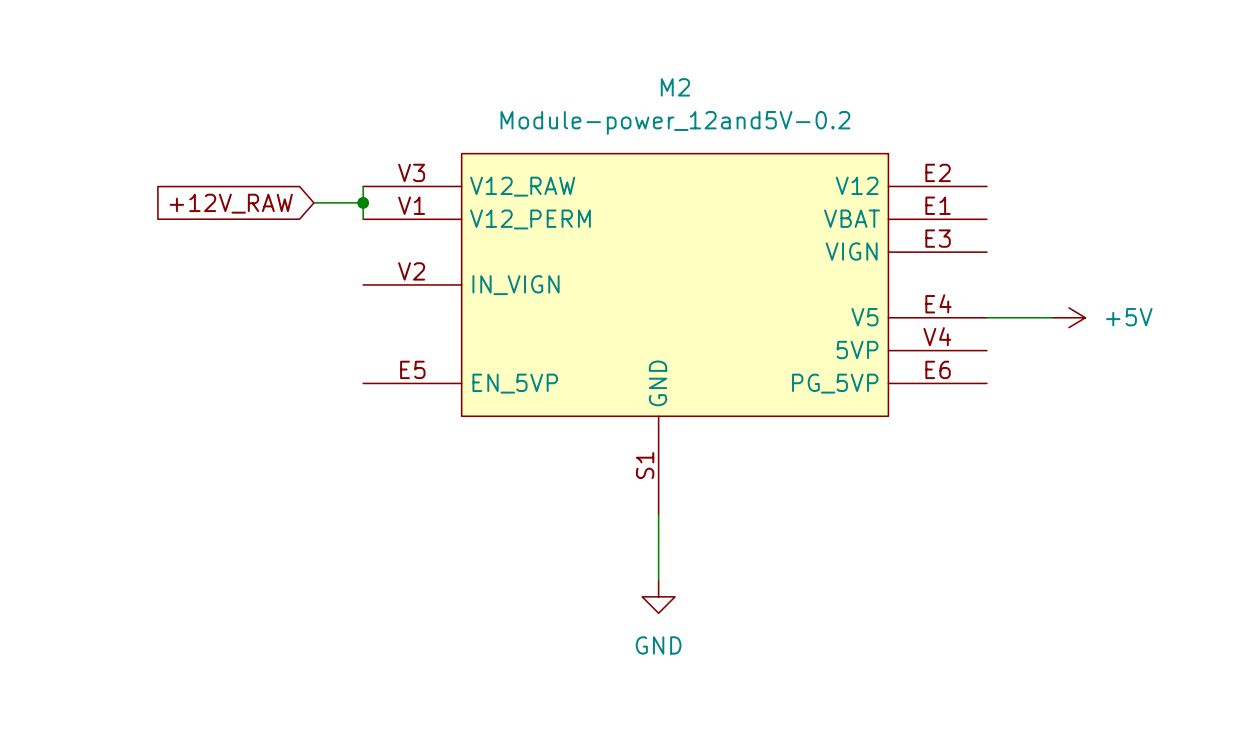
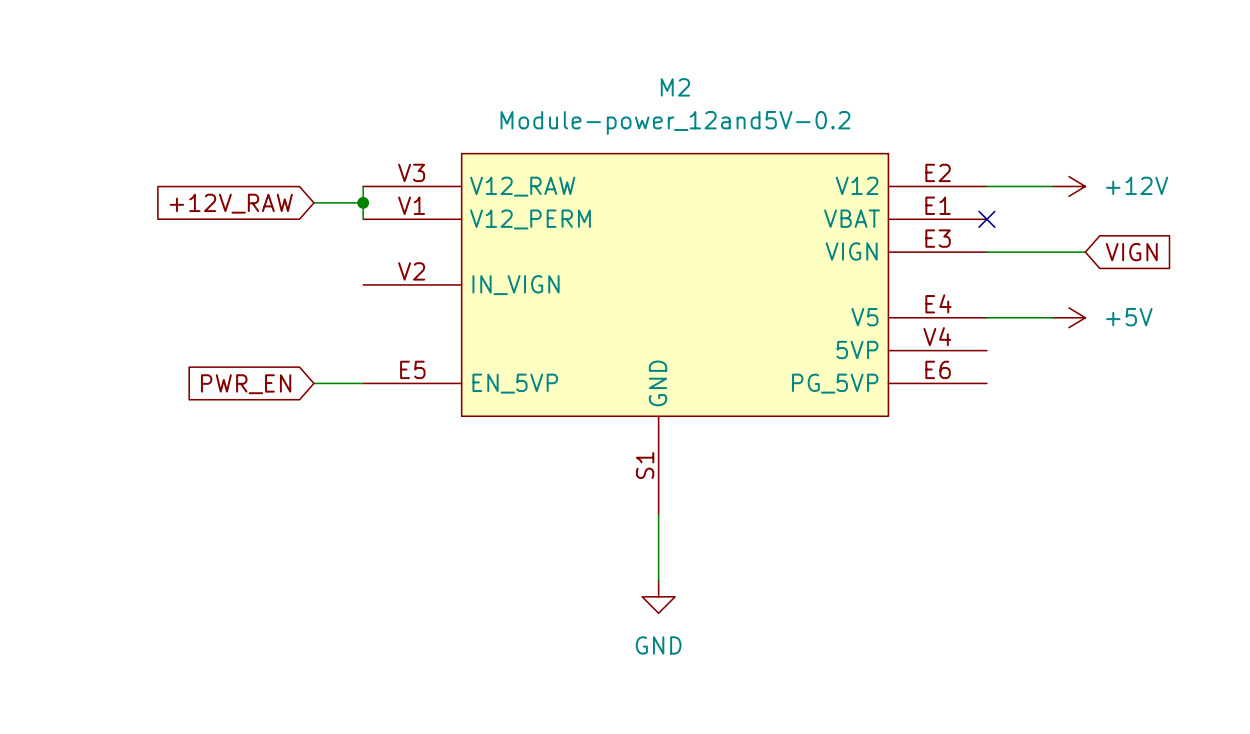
wire: none -> (986, 186) (1052, 186)
power symbol: none -> +12V (1068, 186)
no-connect mark: none -> (986, 219)
wire: none -> (986, 252) (1085, 252)
global label: none -> VIGN (1131, 252)
wire: none -> (313, 383) (363, 383)
global label: none -> PWR_EN (246, 384)

